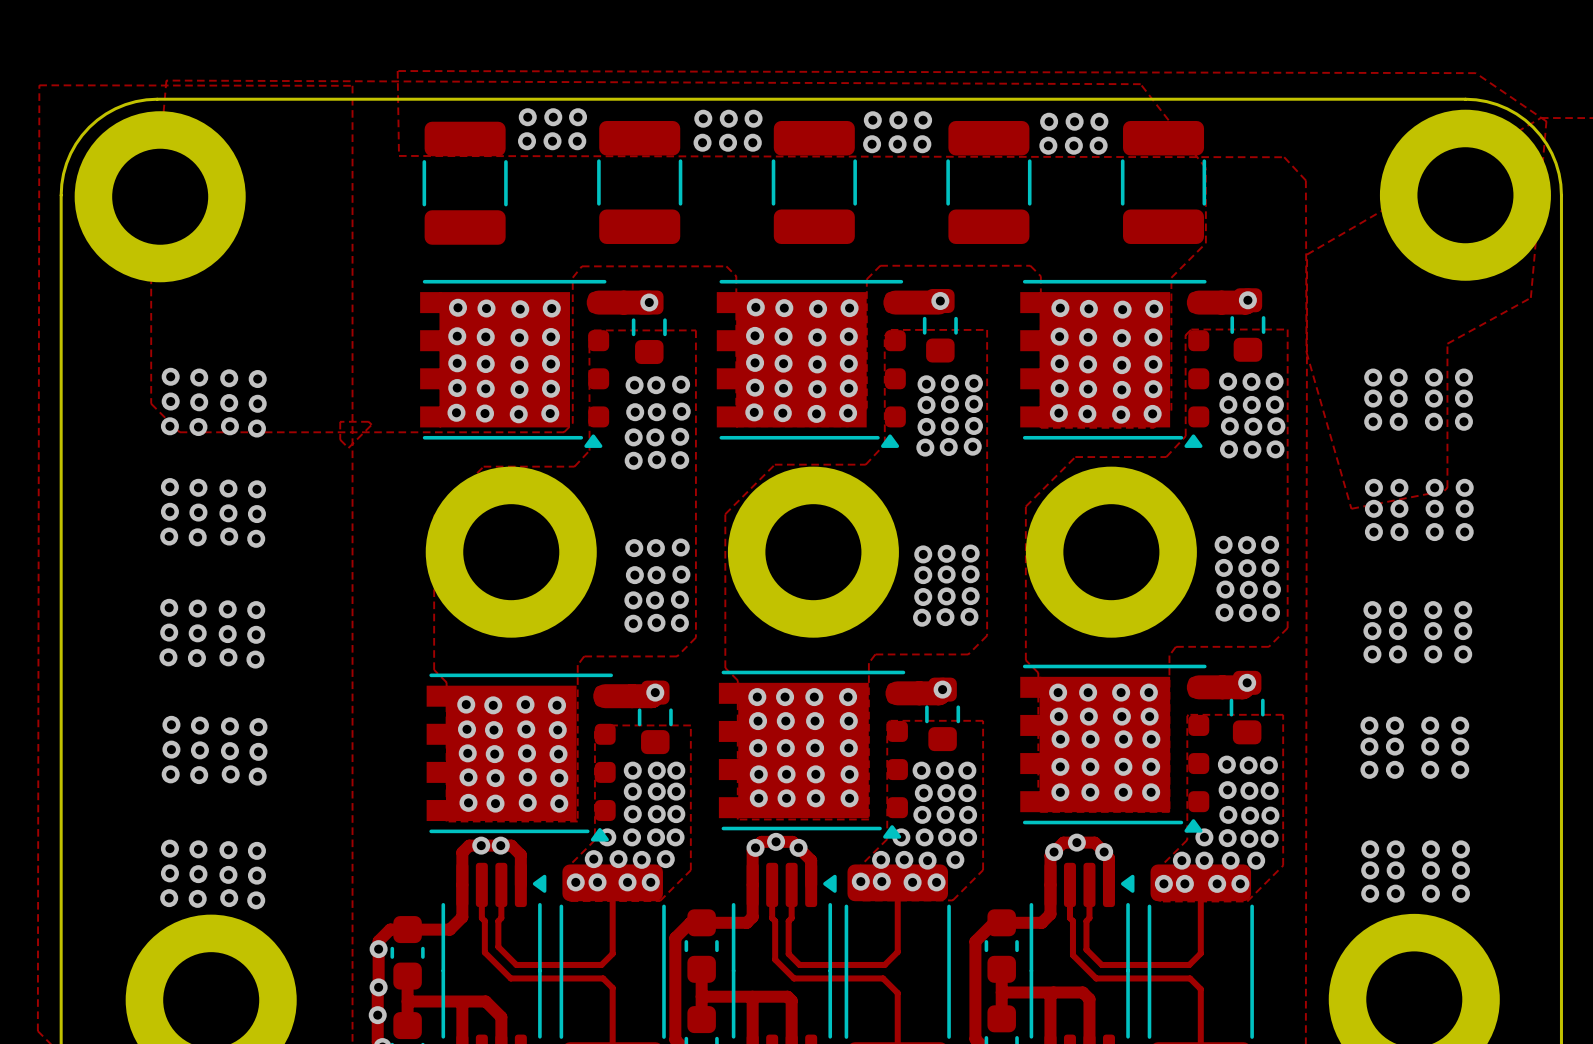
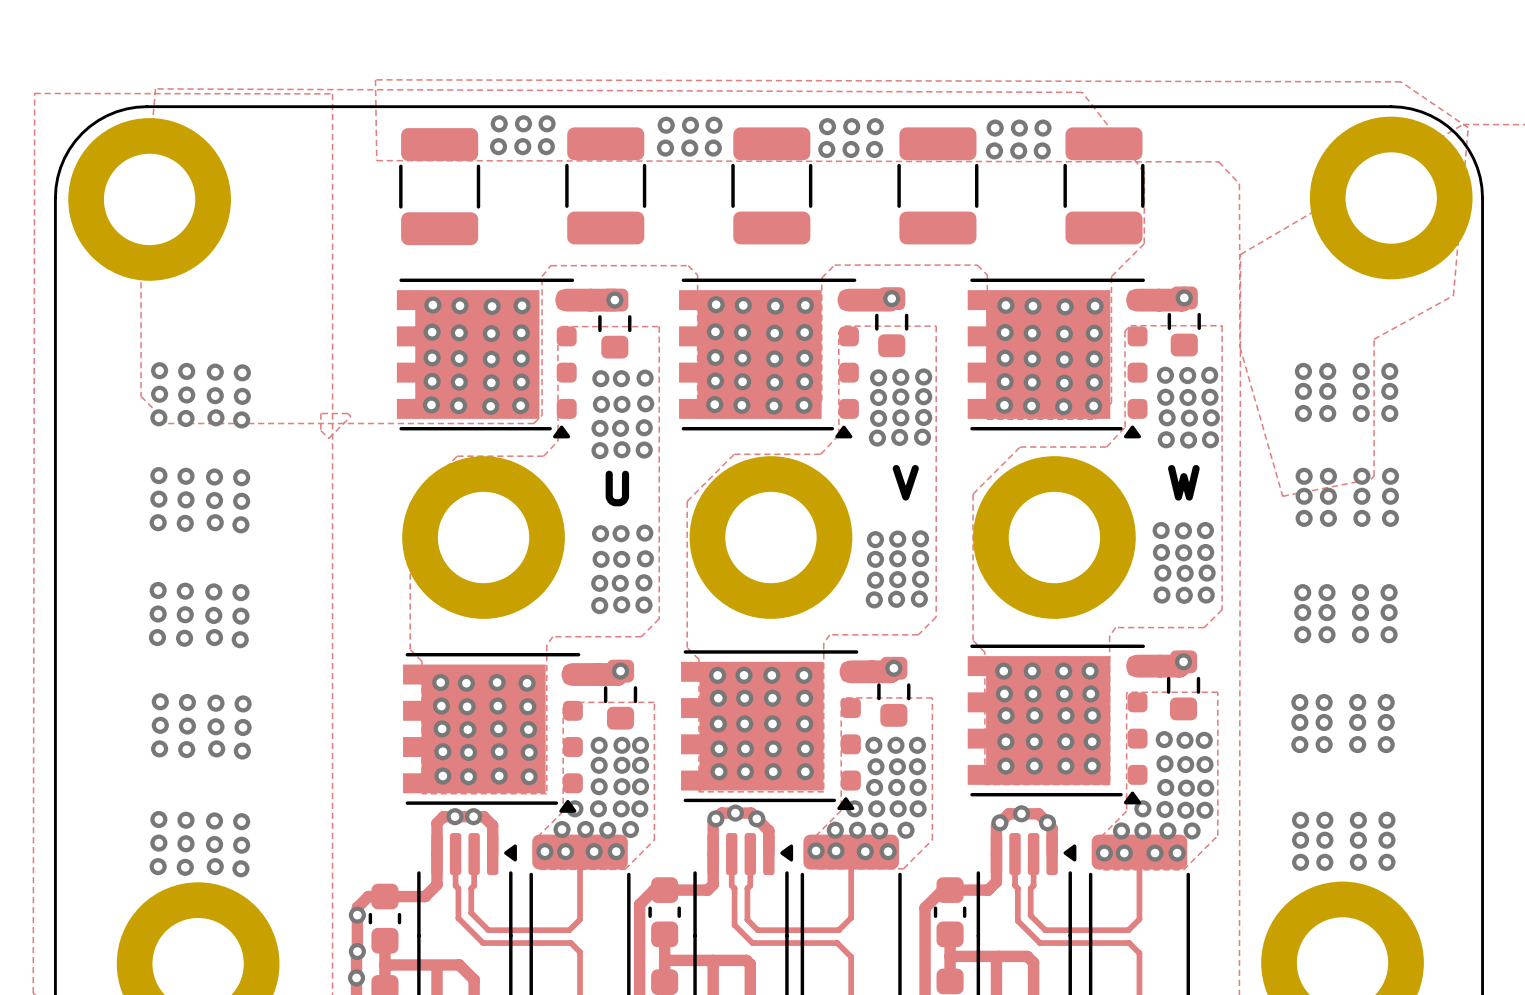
text: none -> V (905, 482)
text: none -> W (1183, 482)
text: none -> U (617, 488)

